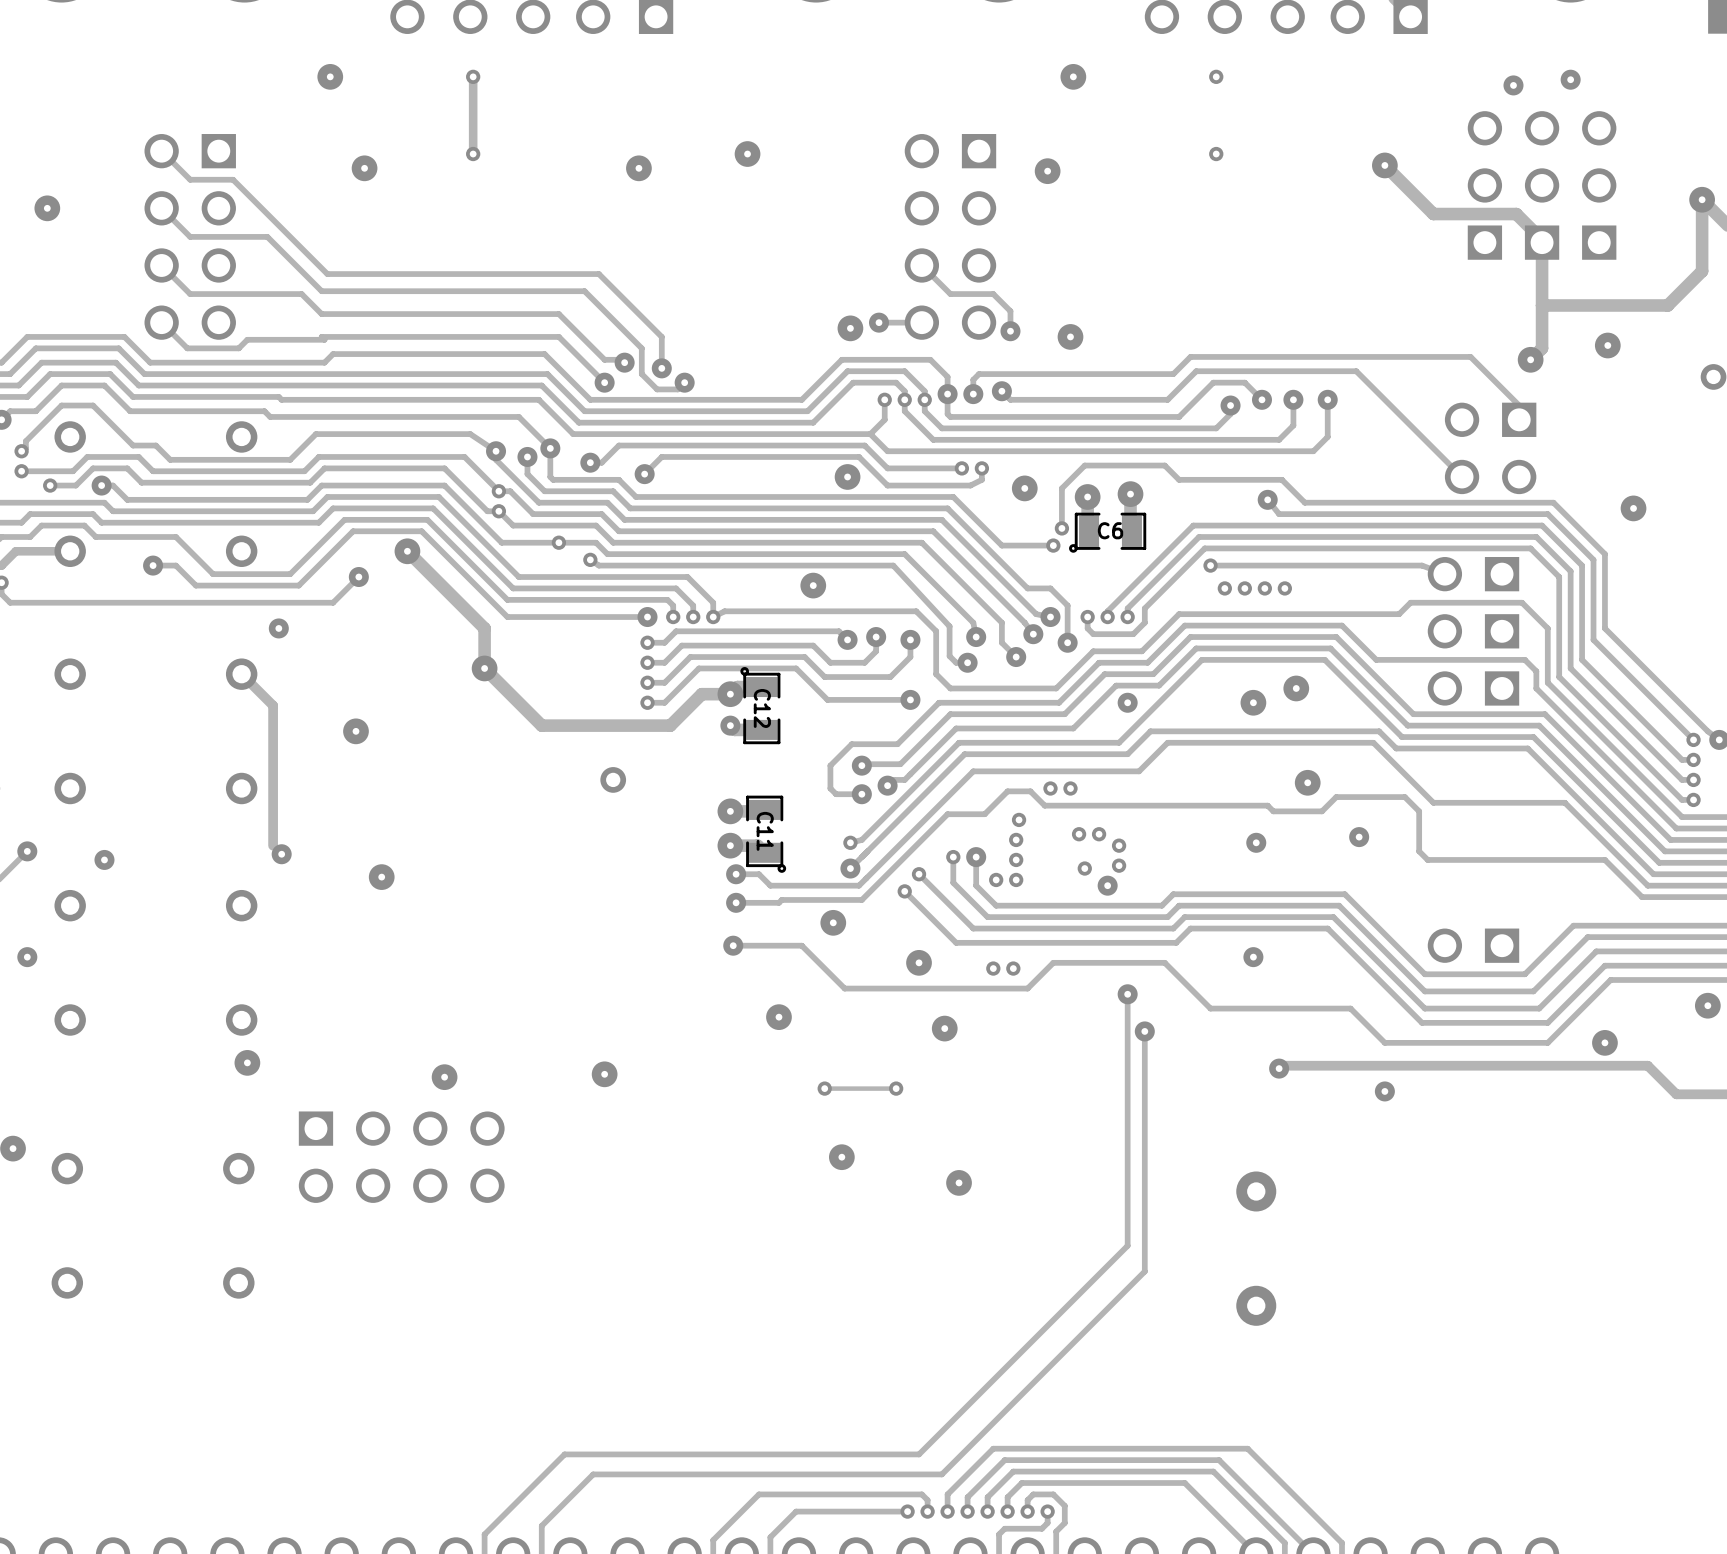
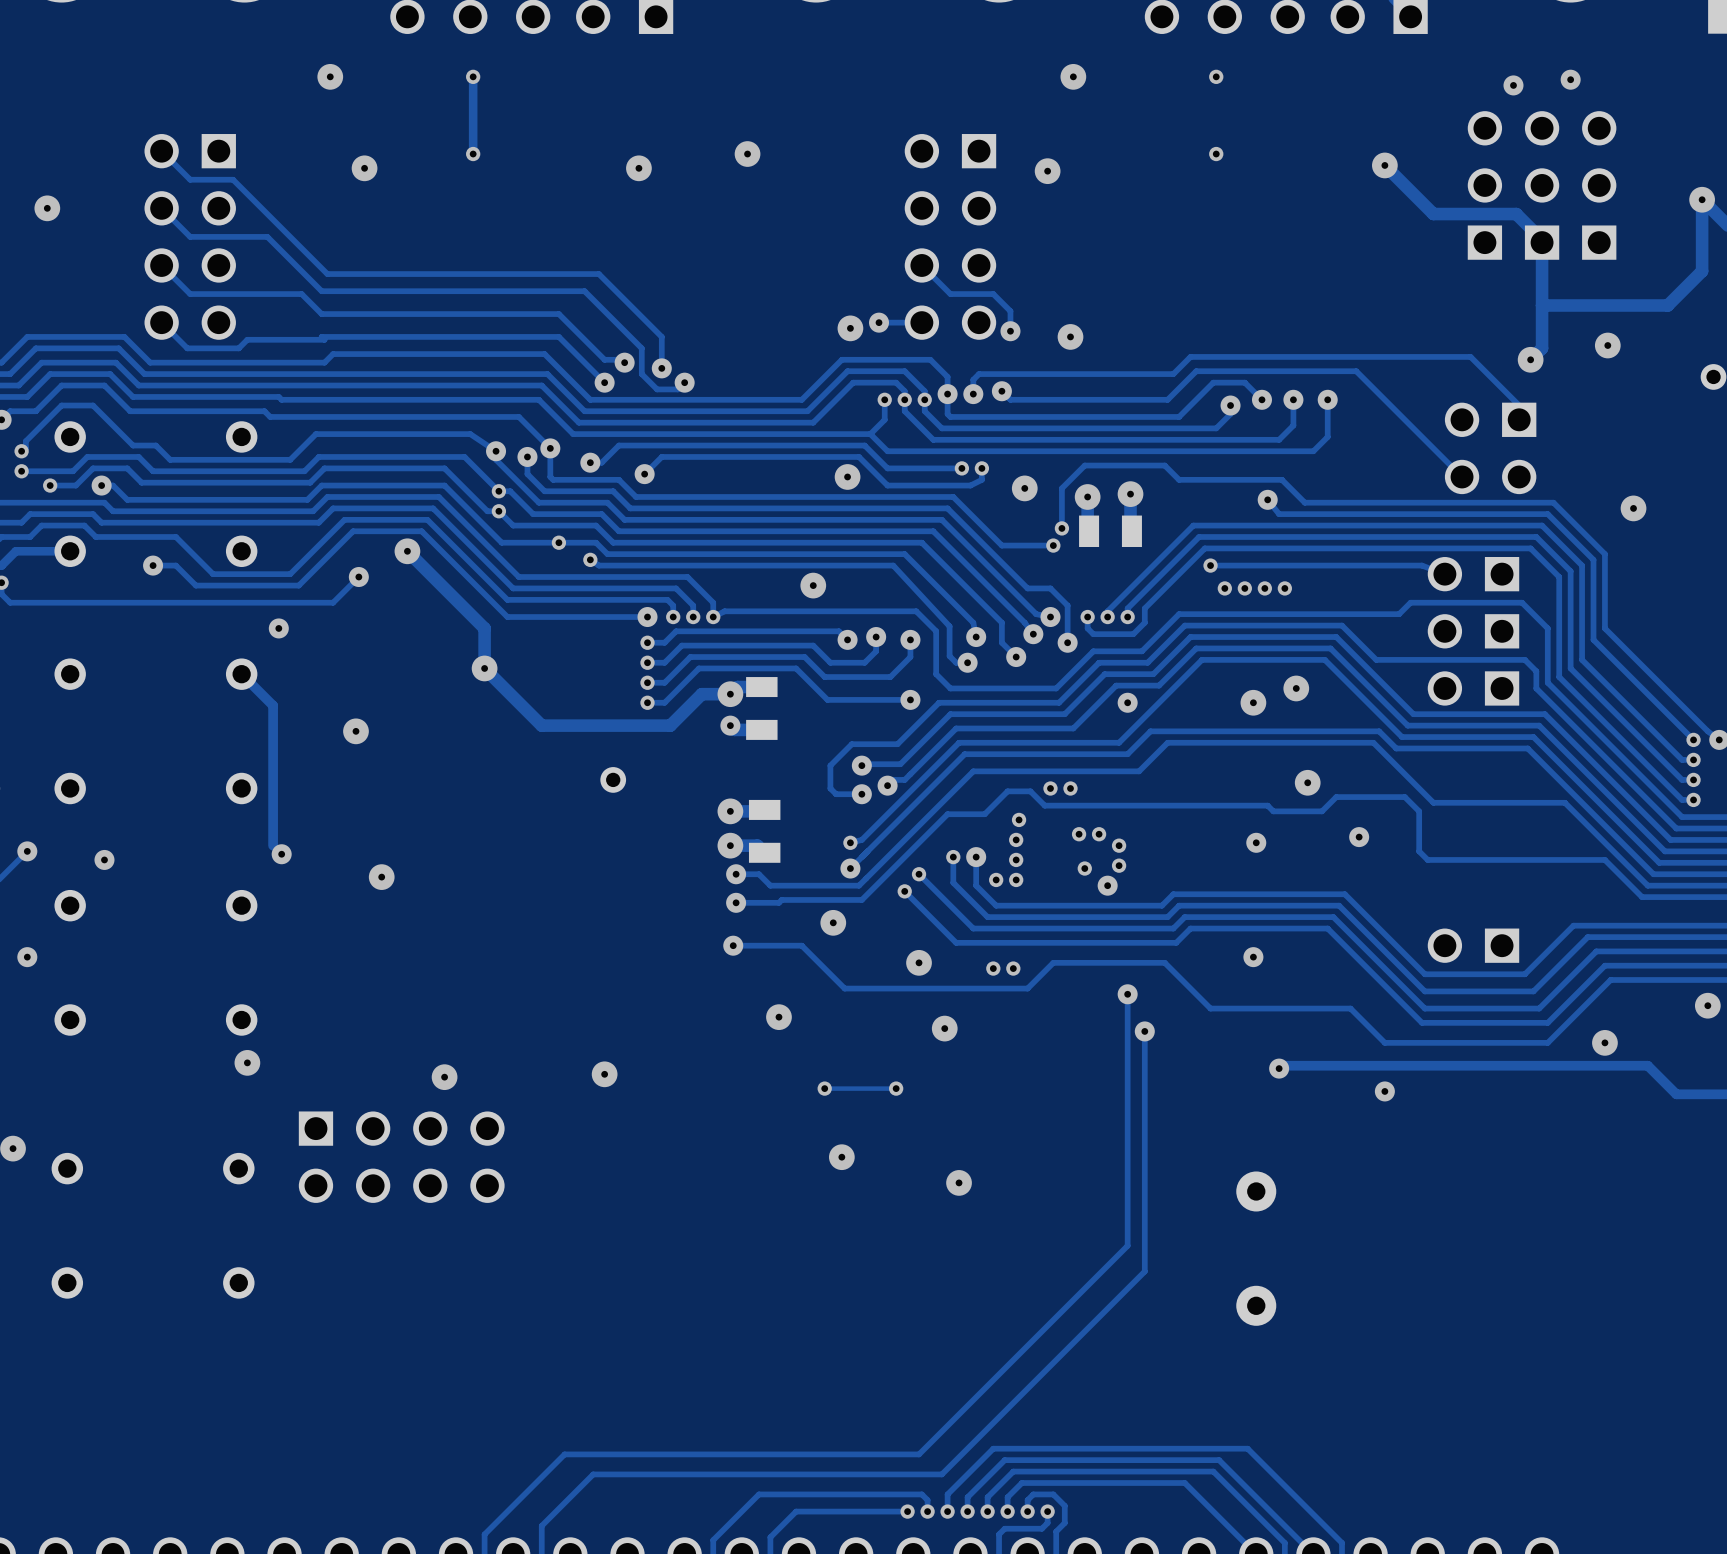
part: none -> (1110, 531)
C6: (1107, 532) -> none
C12: (760, 705) -> none
part: none -> (761, 708)
part: none -> (764, 831)
C11: (766, 834) -> none

